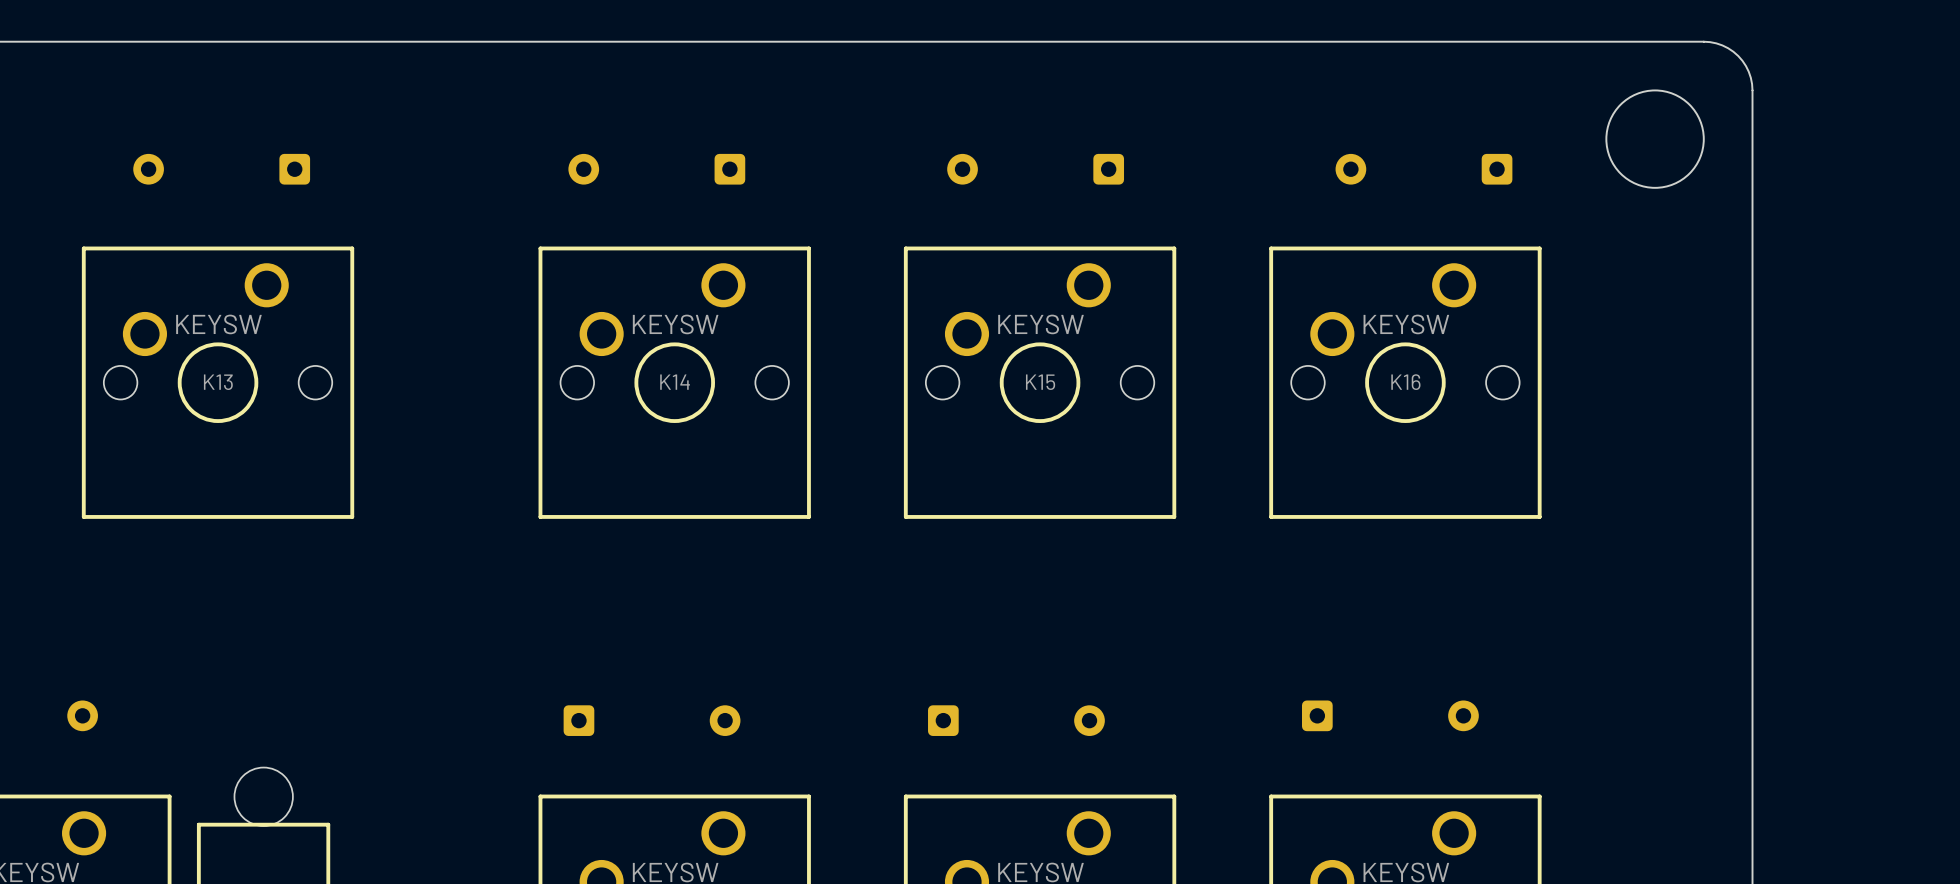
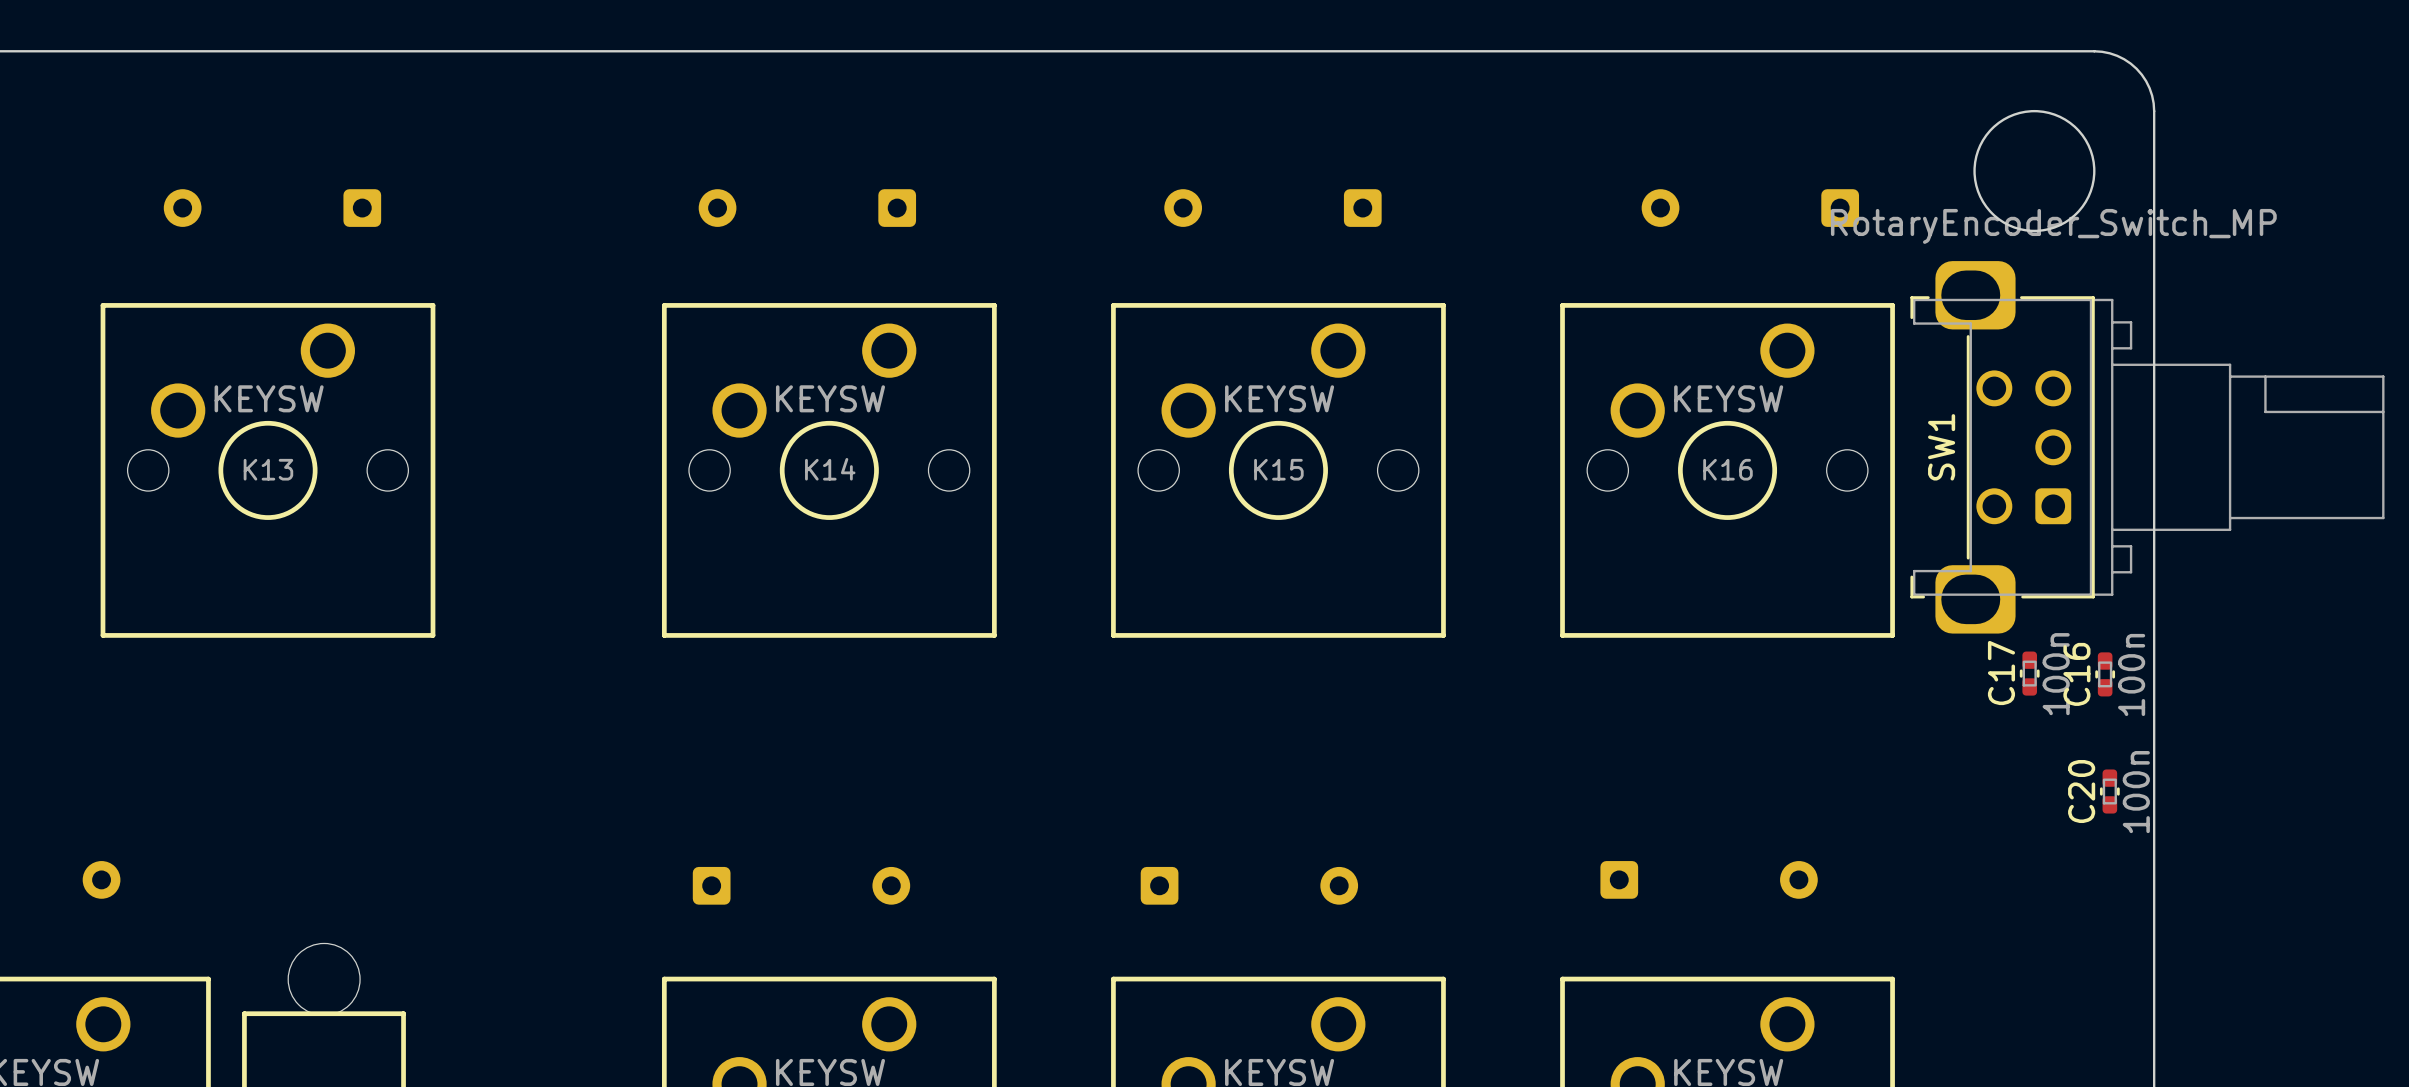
SW1: none -> RotaryEncoder_Switch_MP (2147, 447)
C17: none -> 100n (2029, 673)
C16: none -> 100n (2105, 674)
C20: none -> 100n (2109, 791)

